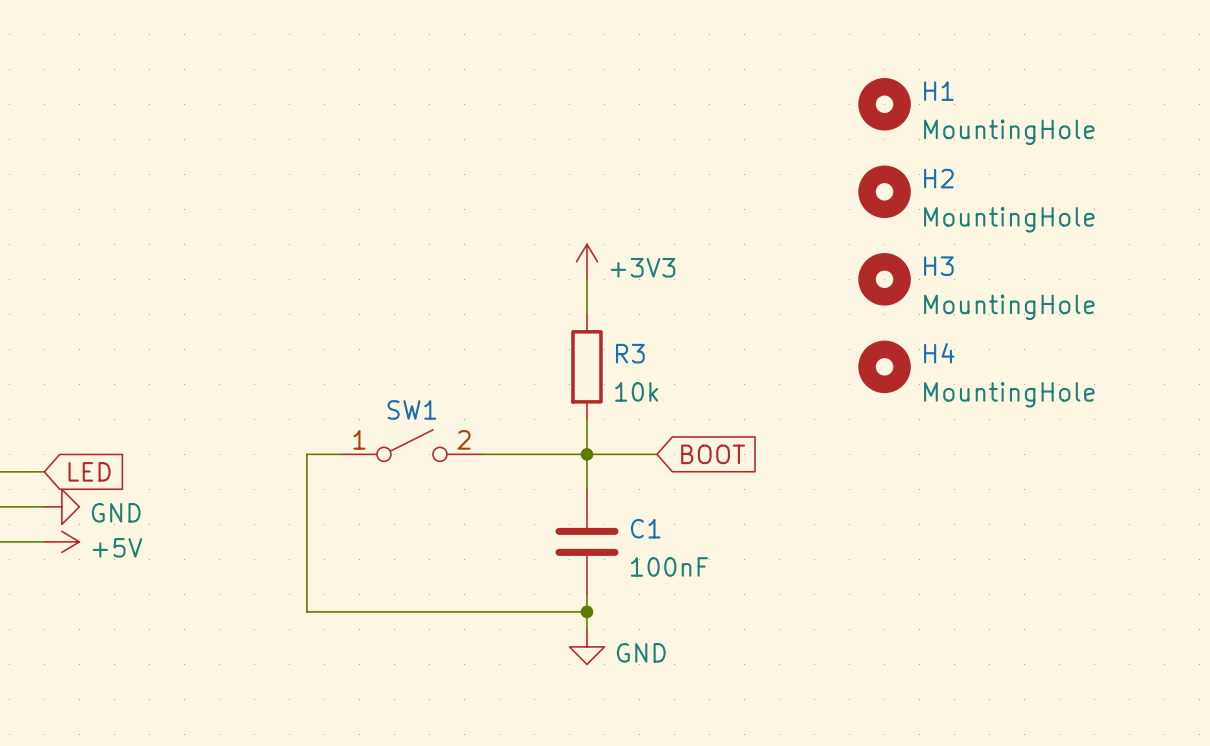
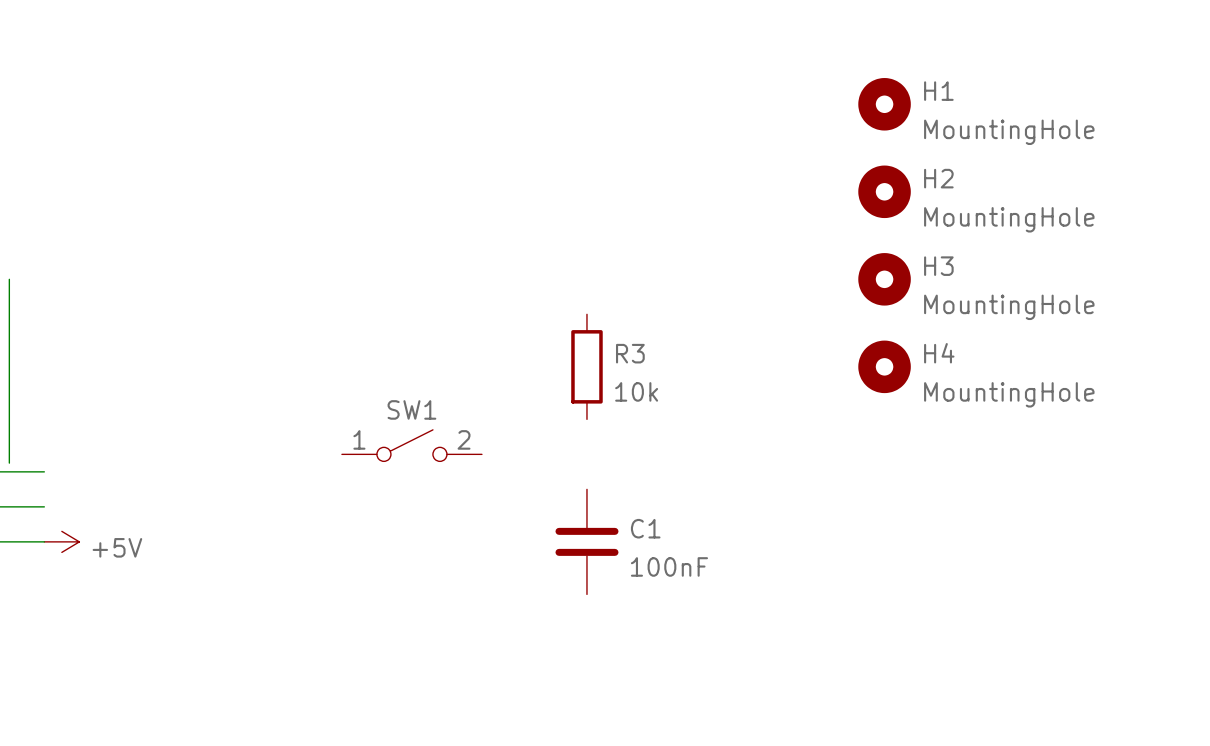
power symbol: +3V3 (586, 261) -> none
wire: none -> (9, 279) (9, 463)
wire: (586, 279) (586, 314) -> none
wire: (586, 419) (586, 489) -> none
wire: (341, 454) (306, 454) (306, 611) (586, 611) -> none
wire: (481, 454) (657, 454) -> none
junction: (586, 454) -> none
global label: BOOT (713, 454) -> none
global label: LED (89, 471) -> none
power symbol: GND (61, 506) -> none
wire: (586, 594) (586, 629) -> none
junction: (586, 611) -> none
power symbol: GND (586, 646) -> none

